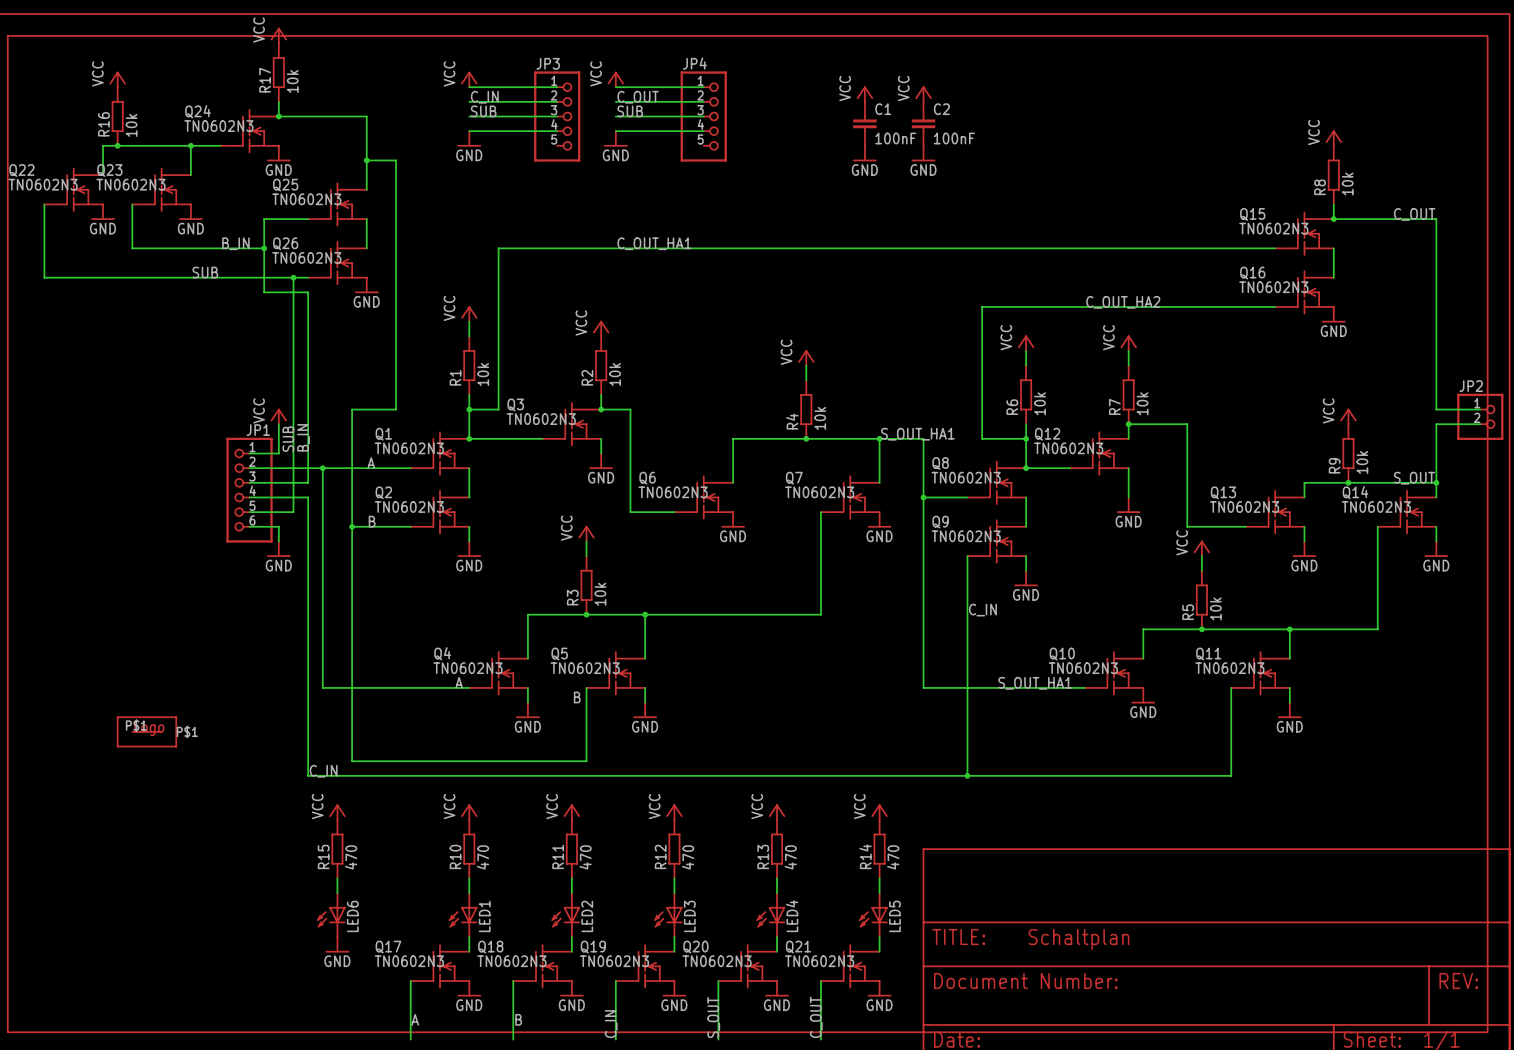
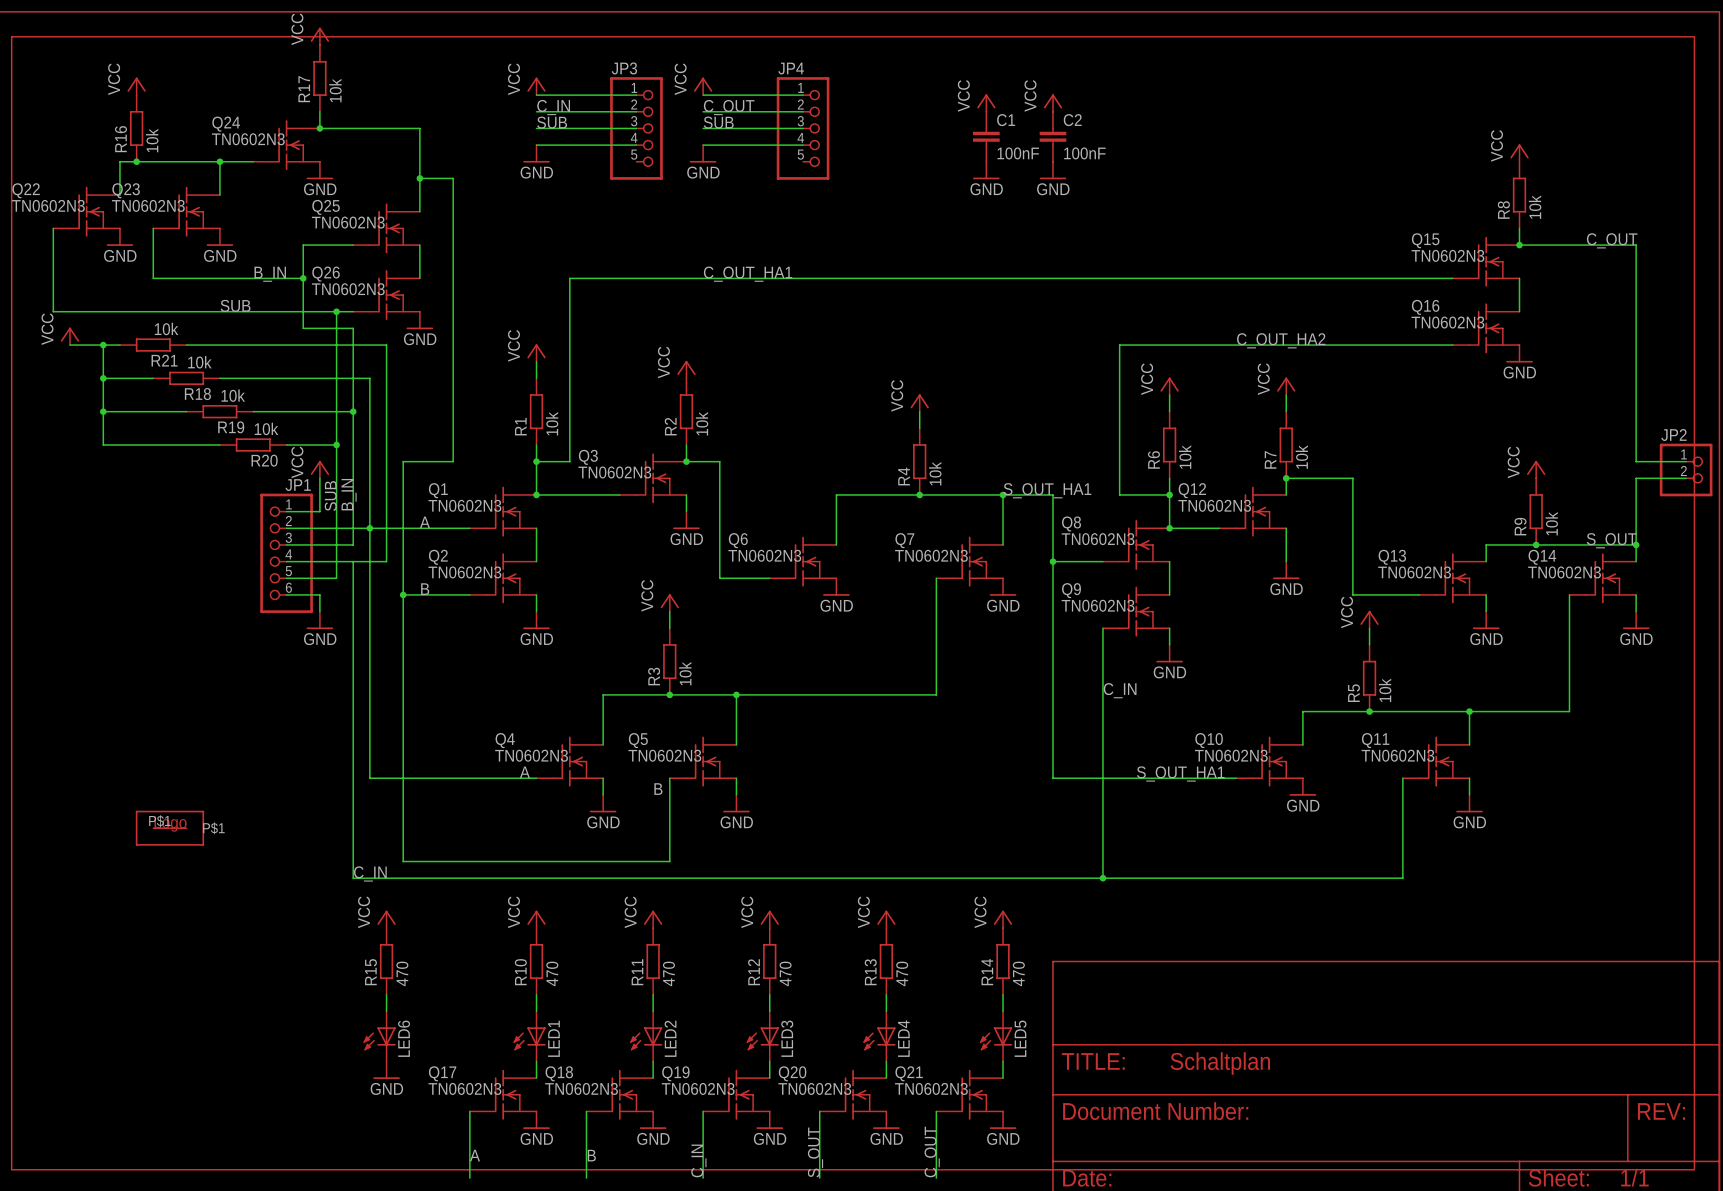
power symbol: none -> VCC (69, 336)
wire: none -> (69, 345) (119, 345)
wire: none -> (103, 345) (103, 445) (219, 445)
junction: none -> (103, 345)
R21: none -> 10k (153, 345)
wire: none -> (186, 345) (386, 345) (386, 561) (353, 561)
wire: none -> (103, 378) (153, 378)
junction: none -> (103, 378)
R18: none -> 10k (186, 378)
wire: none -> (219, 378) (369, 378) (369, 528)
wire: none -> (103, 411) (186, 411)
junction: none -> (103, 411)
R19: none -> 10k (219, 411)
wire: none -> (253, 411) (353, 411)
junction: none -> (353, 411)
R20: none -> 10k (253, 445)
wire: none -> (286, 445) (336, 445)
junction: none -> (336, 445)

